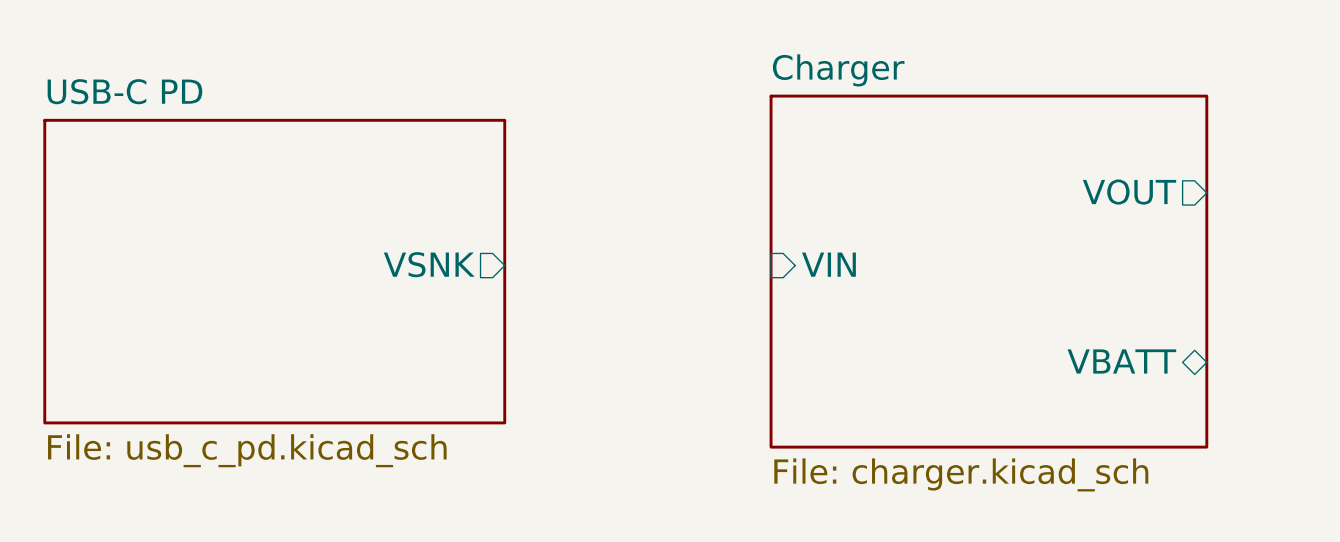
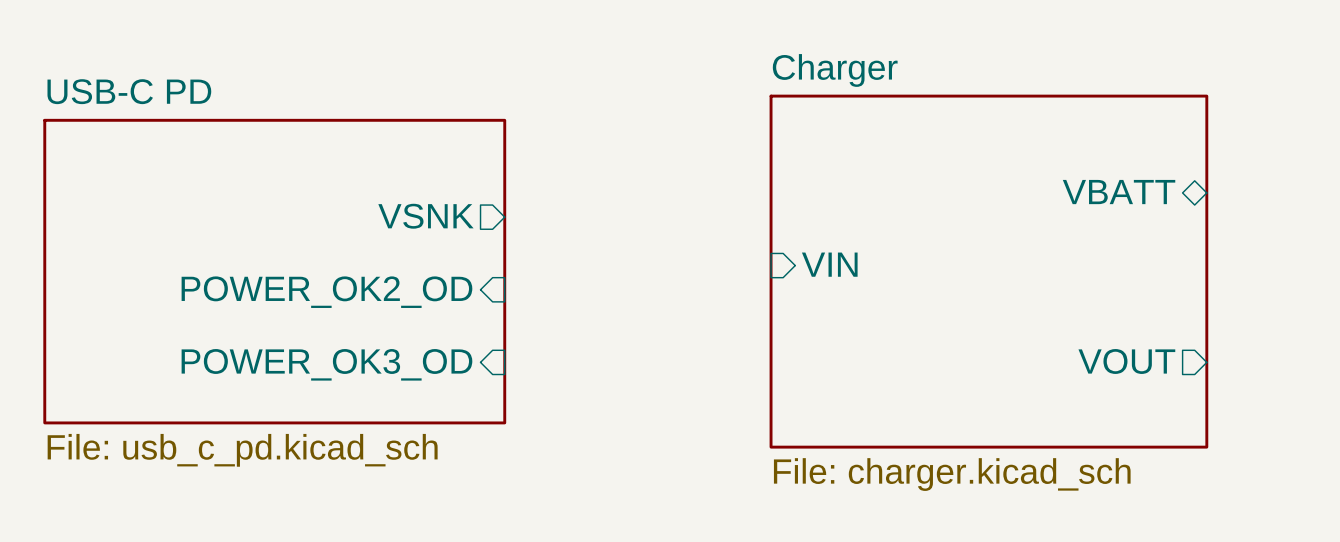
sheet pin shape: output (1129, 192) -> bidirectional (1119, 192)
sheet pin: VOUT (1129, 192) -> VBATT (1119, 192)
sheet pin position: VSNK (429, 264) -> VSNK (425, 216)
sheet pin: none -> POWER_OK2_OD (326, 292)
sheet pin shape: bidirectional (1121, 361) -> output (1126, 361)
sheet pin: VBATT (1121, 361) -> VOUT (1126, 361)
sheet pin: none -> POWER_OK3_OD (326, 364)

